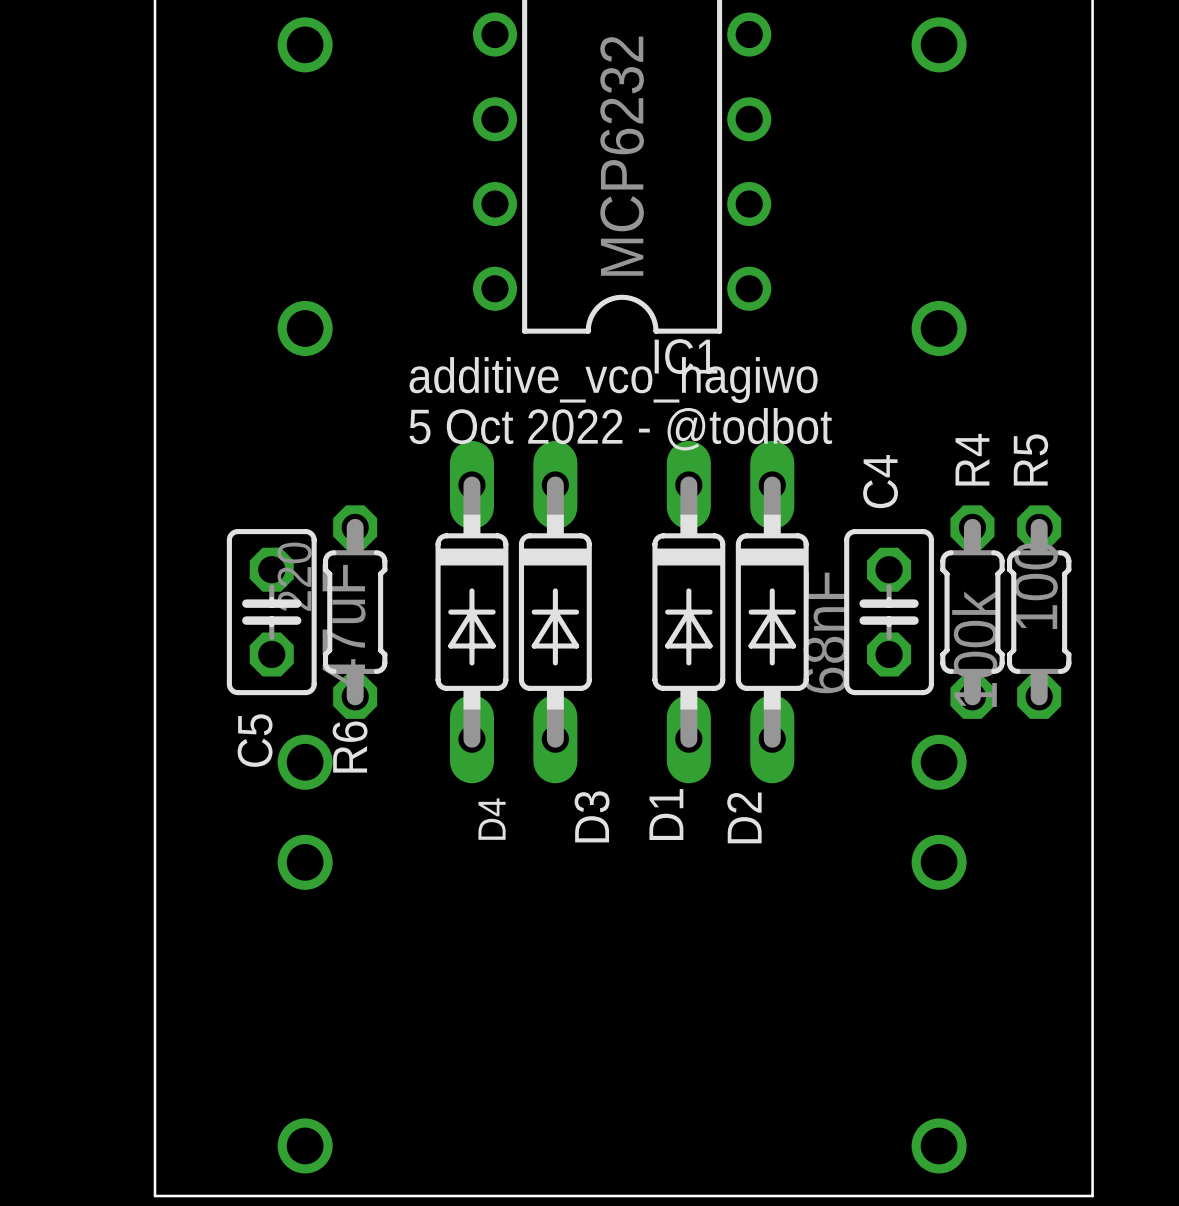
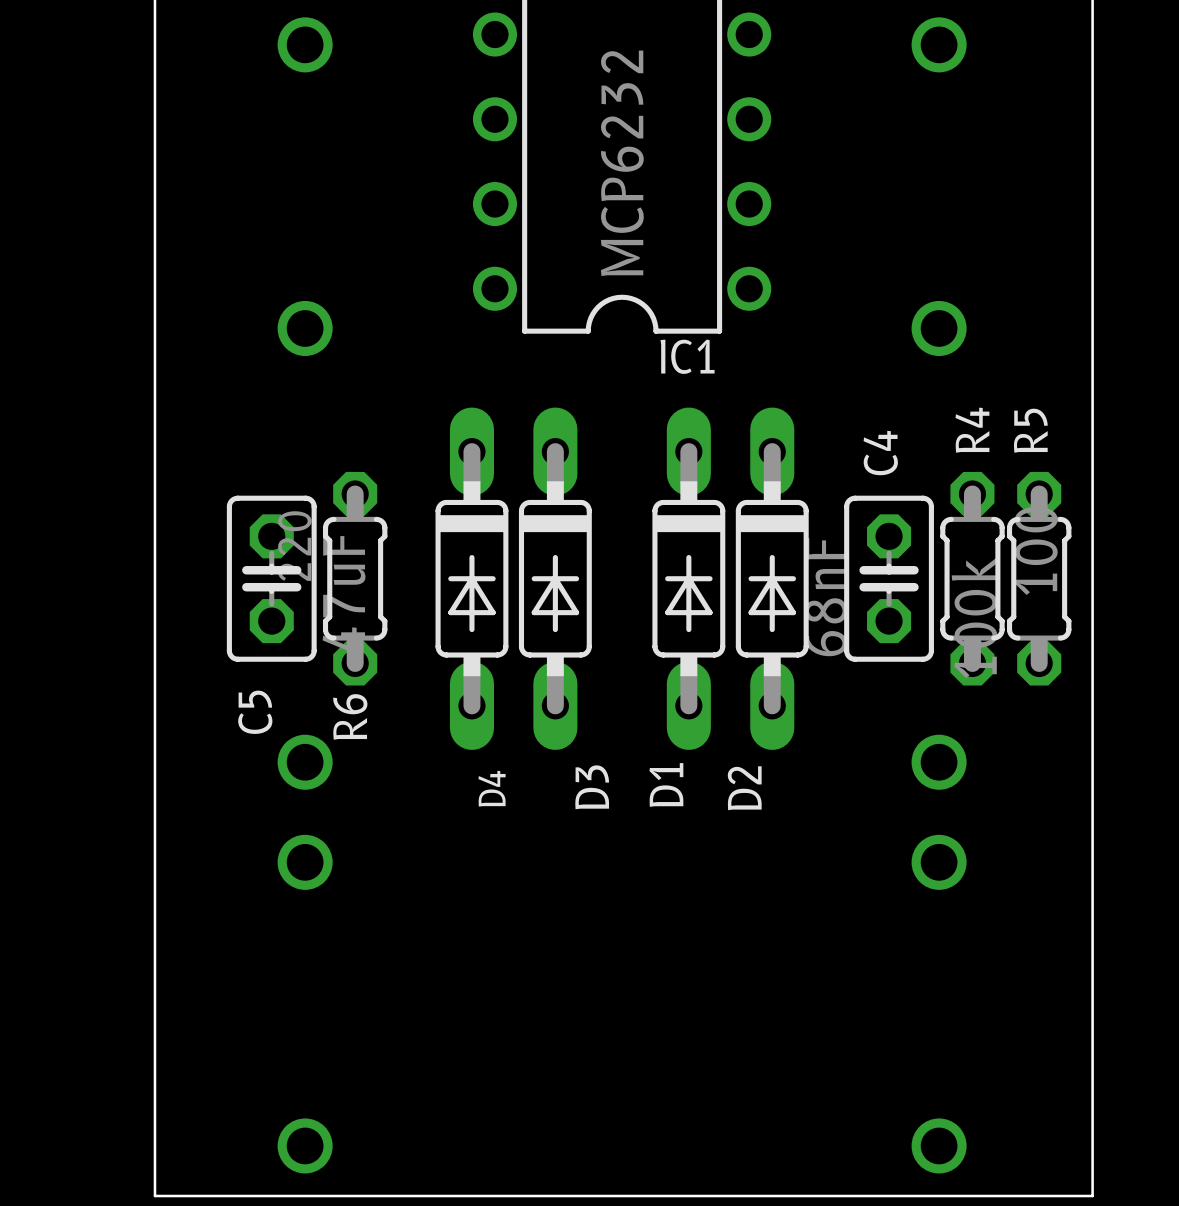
text: additive_vco_hagiwo (613, 380) -> none
text: 5 Oct 2022 - @todbot (620, 429) -> none
C5 position: (271, 612) -> (271, 578)
R6 position: (355, 612) -> (355, 578)
D4 position: (471, 612) -> (471, 578)
D3 position: (555, 612) -> (555, 578)
D1 position: (688, 612) -> (688, 578)
D2 position: (772, 612) -> (772, 578)
C4 position: (889, 612) -> (889, 578)
R4 position: (972, 612) -> (972, 578)
R5 position: (1039, 612) -> (1039, 578)

